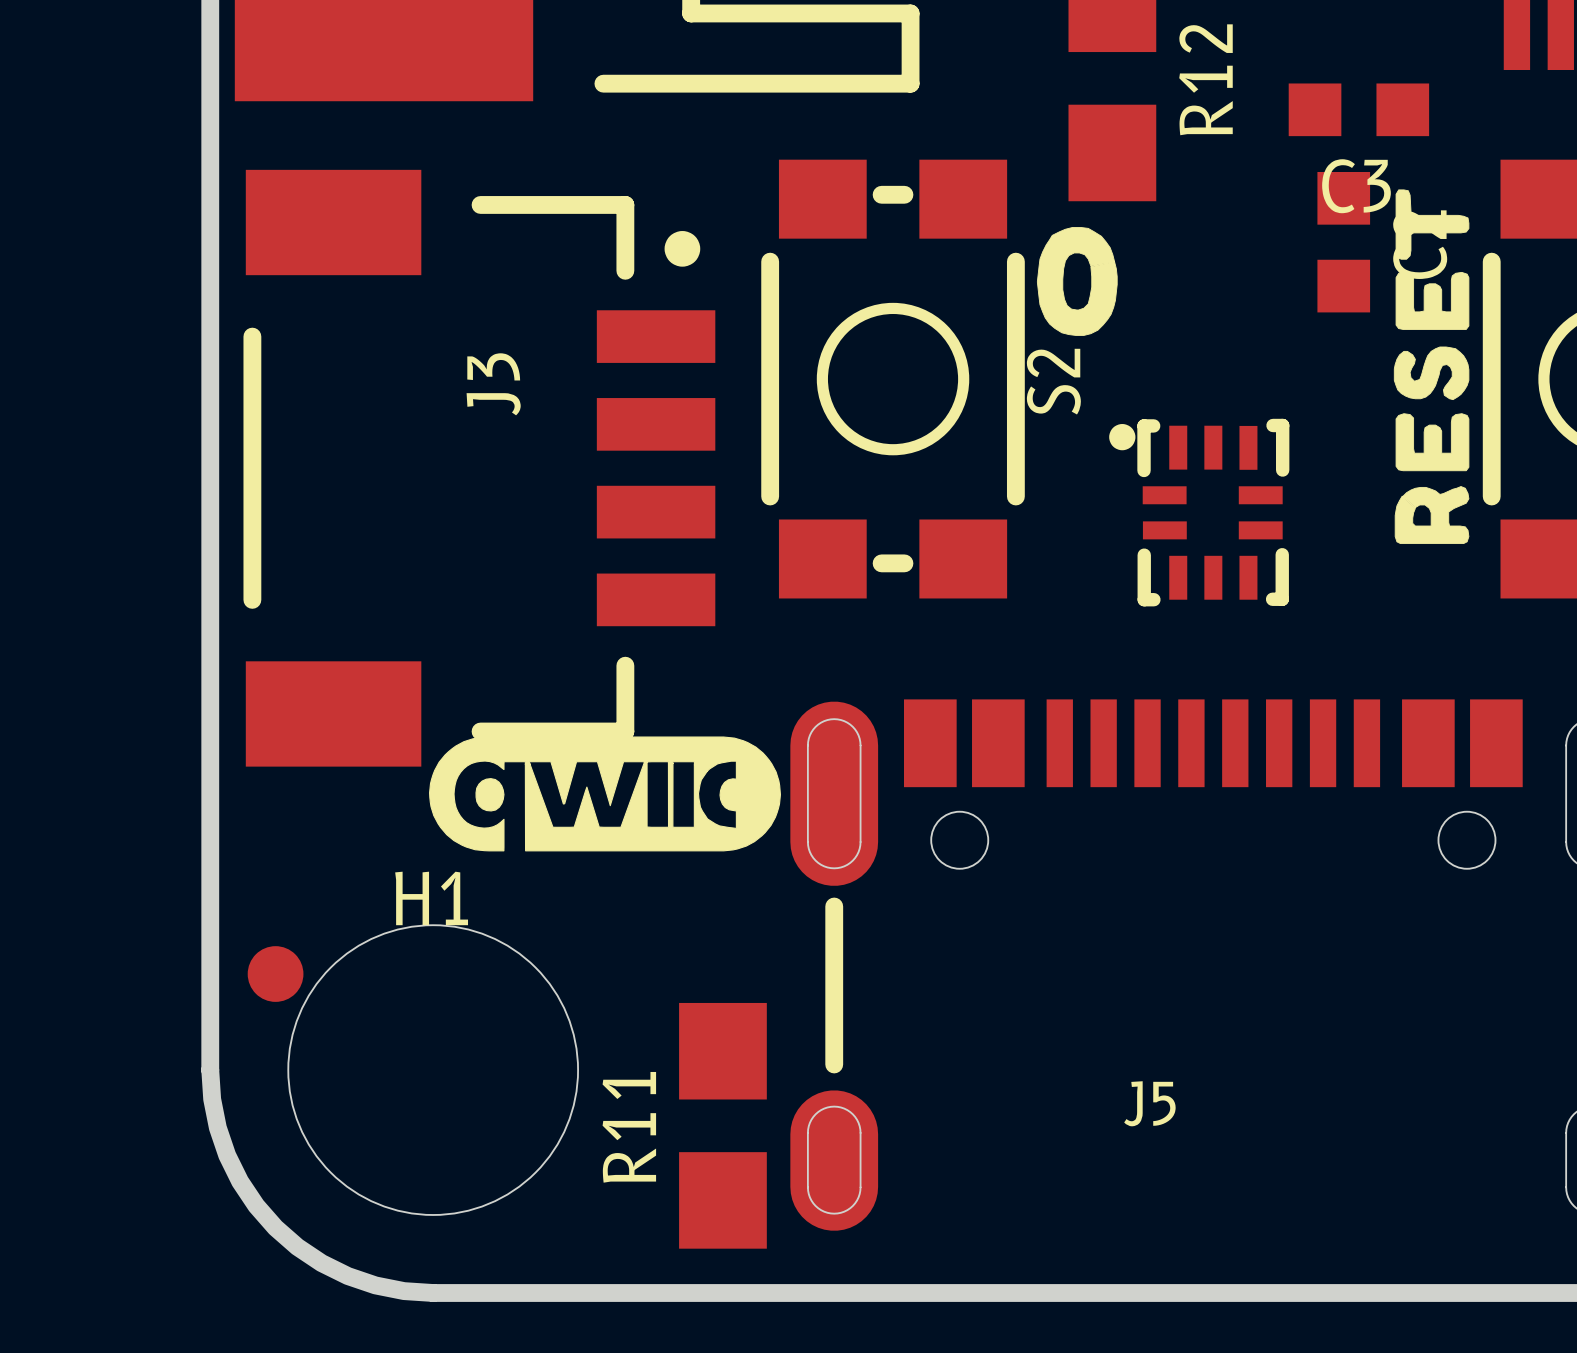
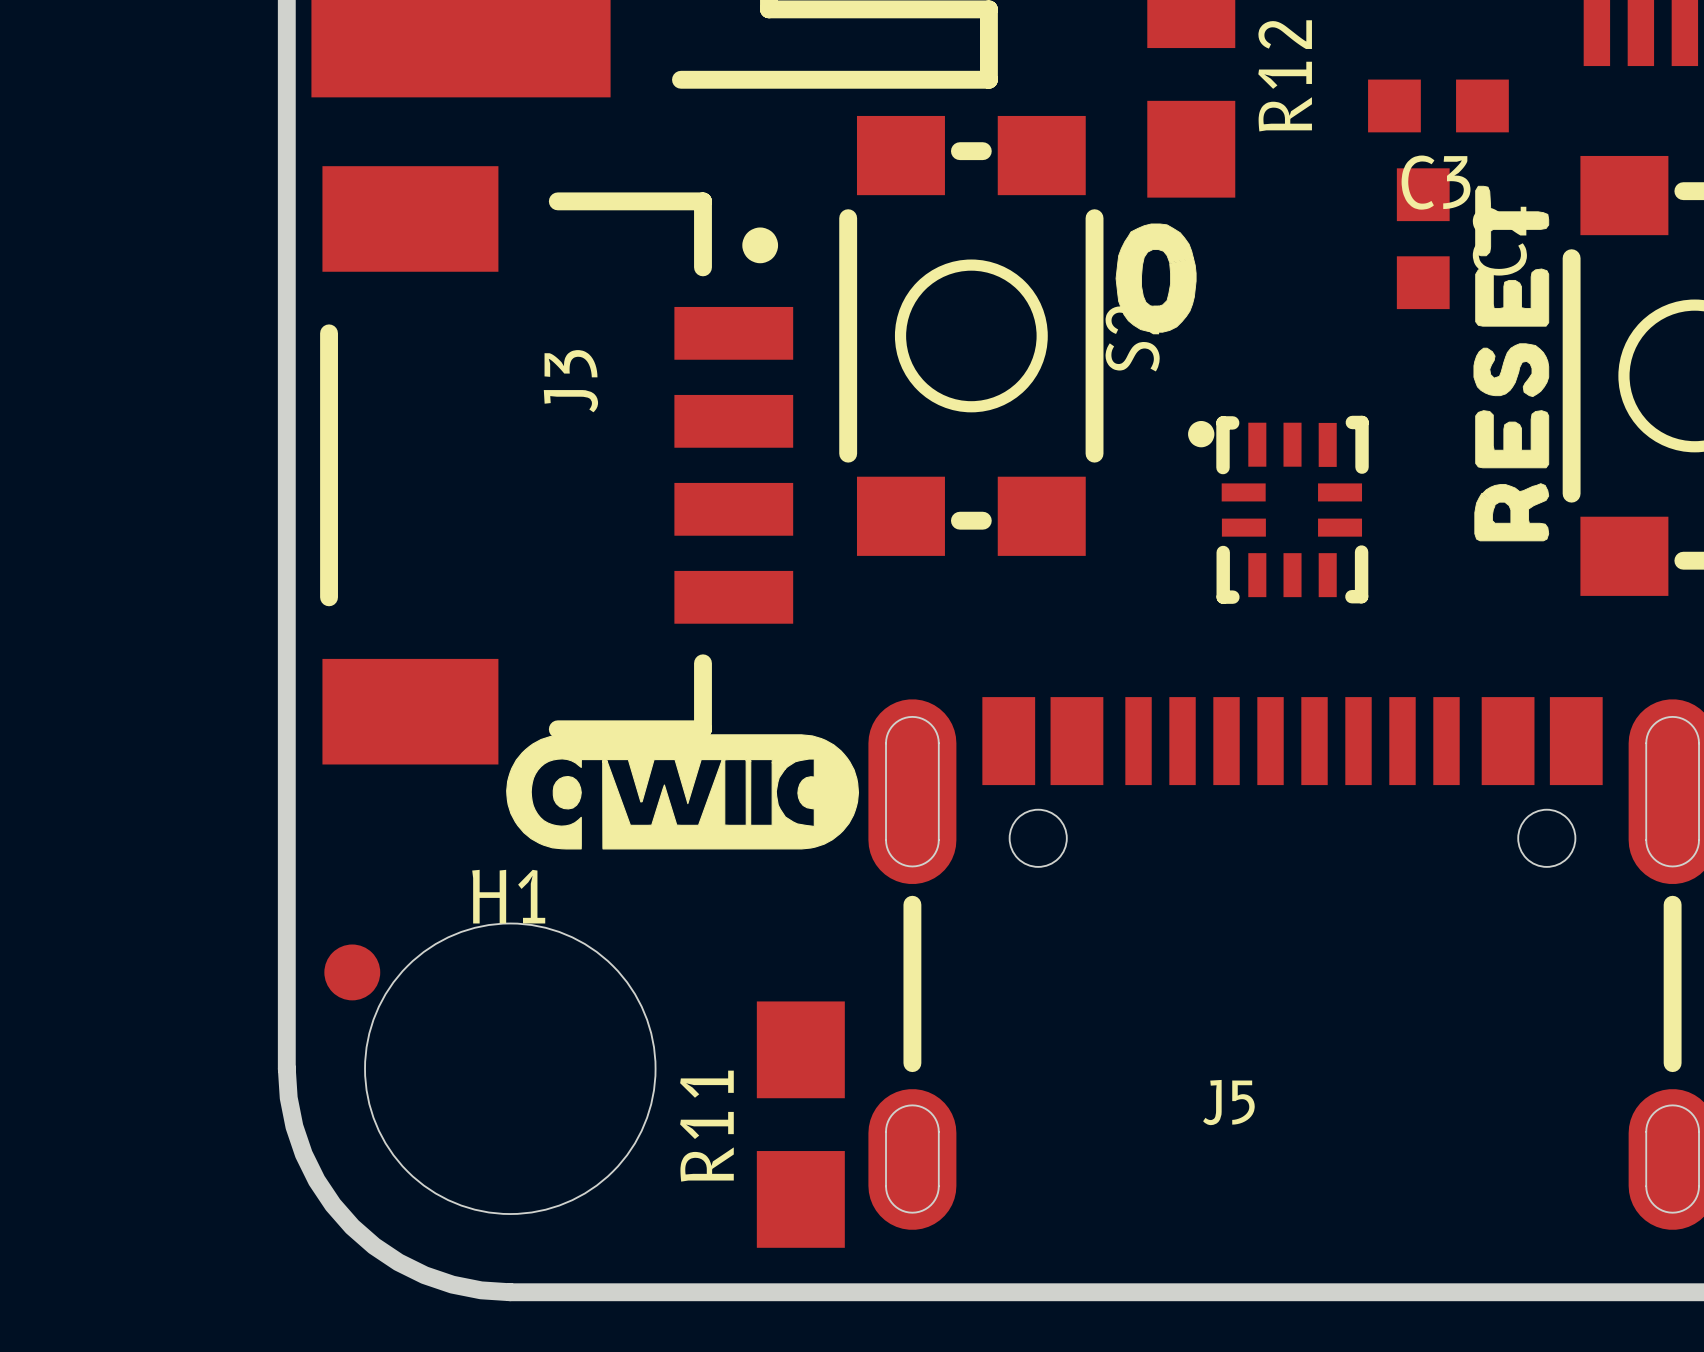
S2 position: (893, 379) -> (971, 335)

